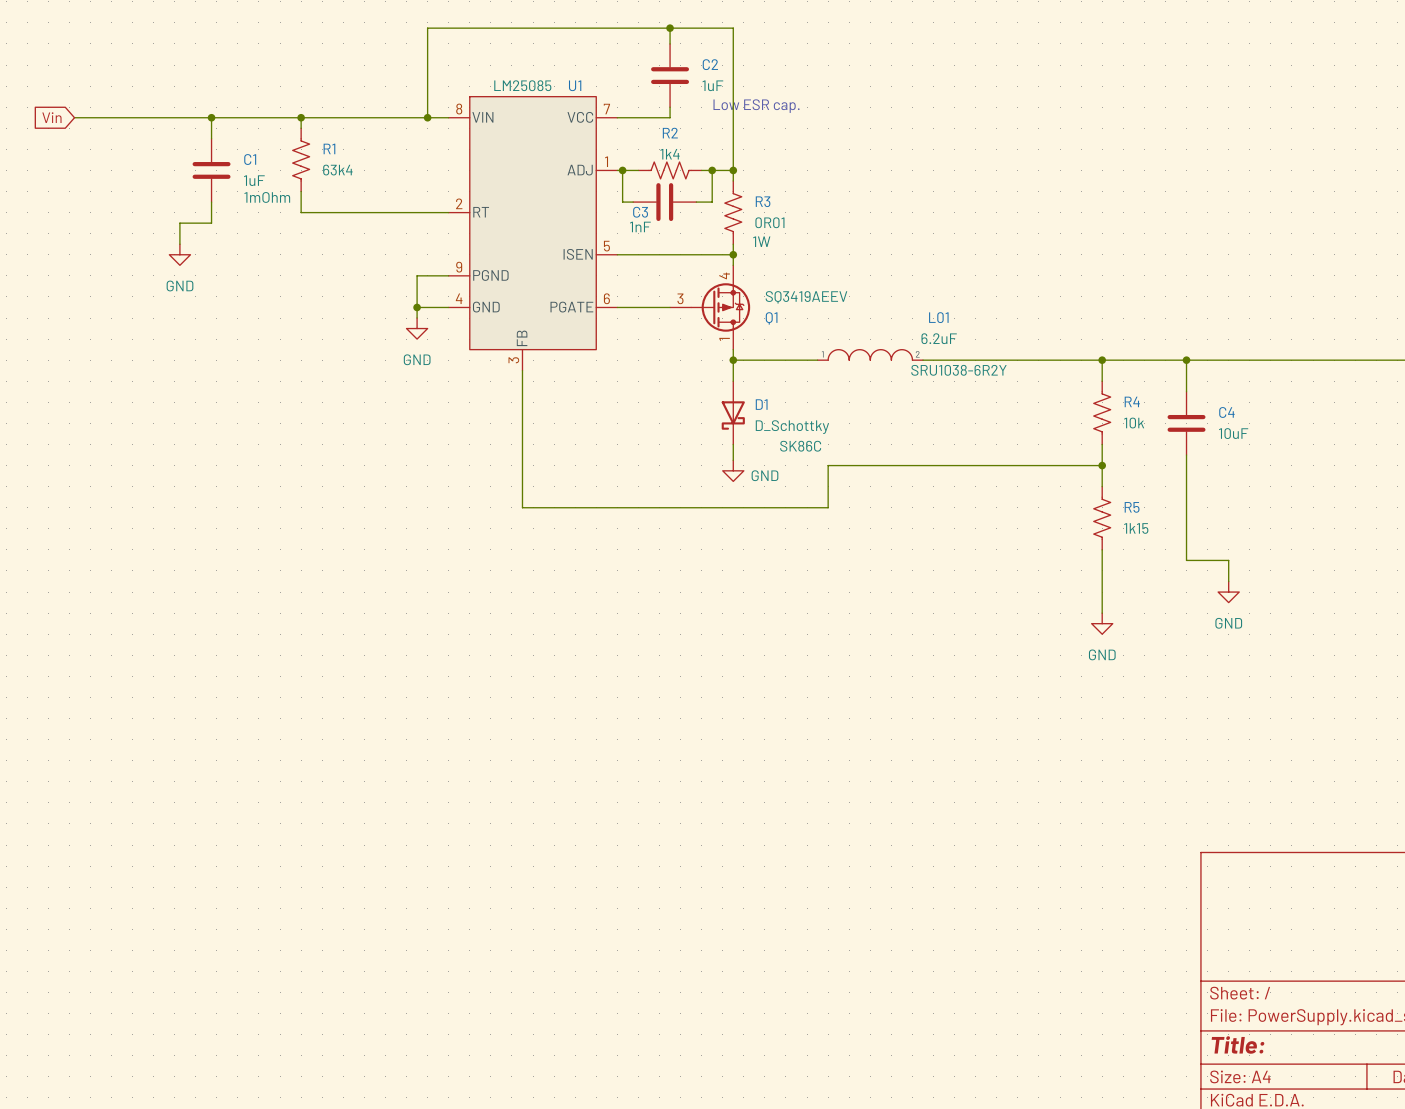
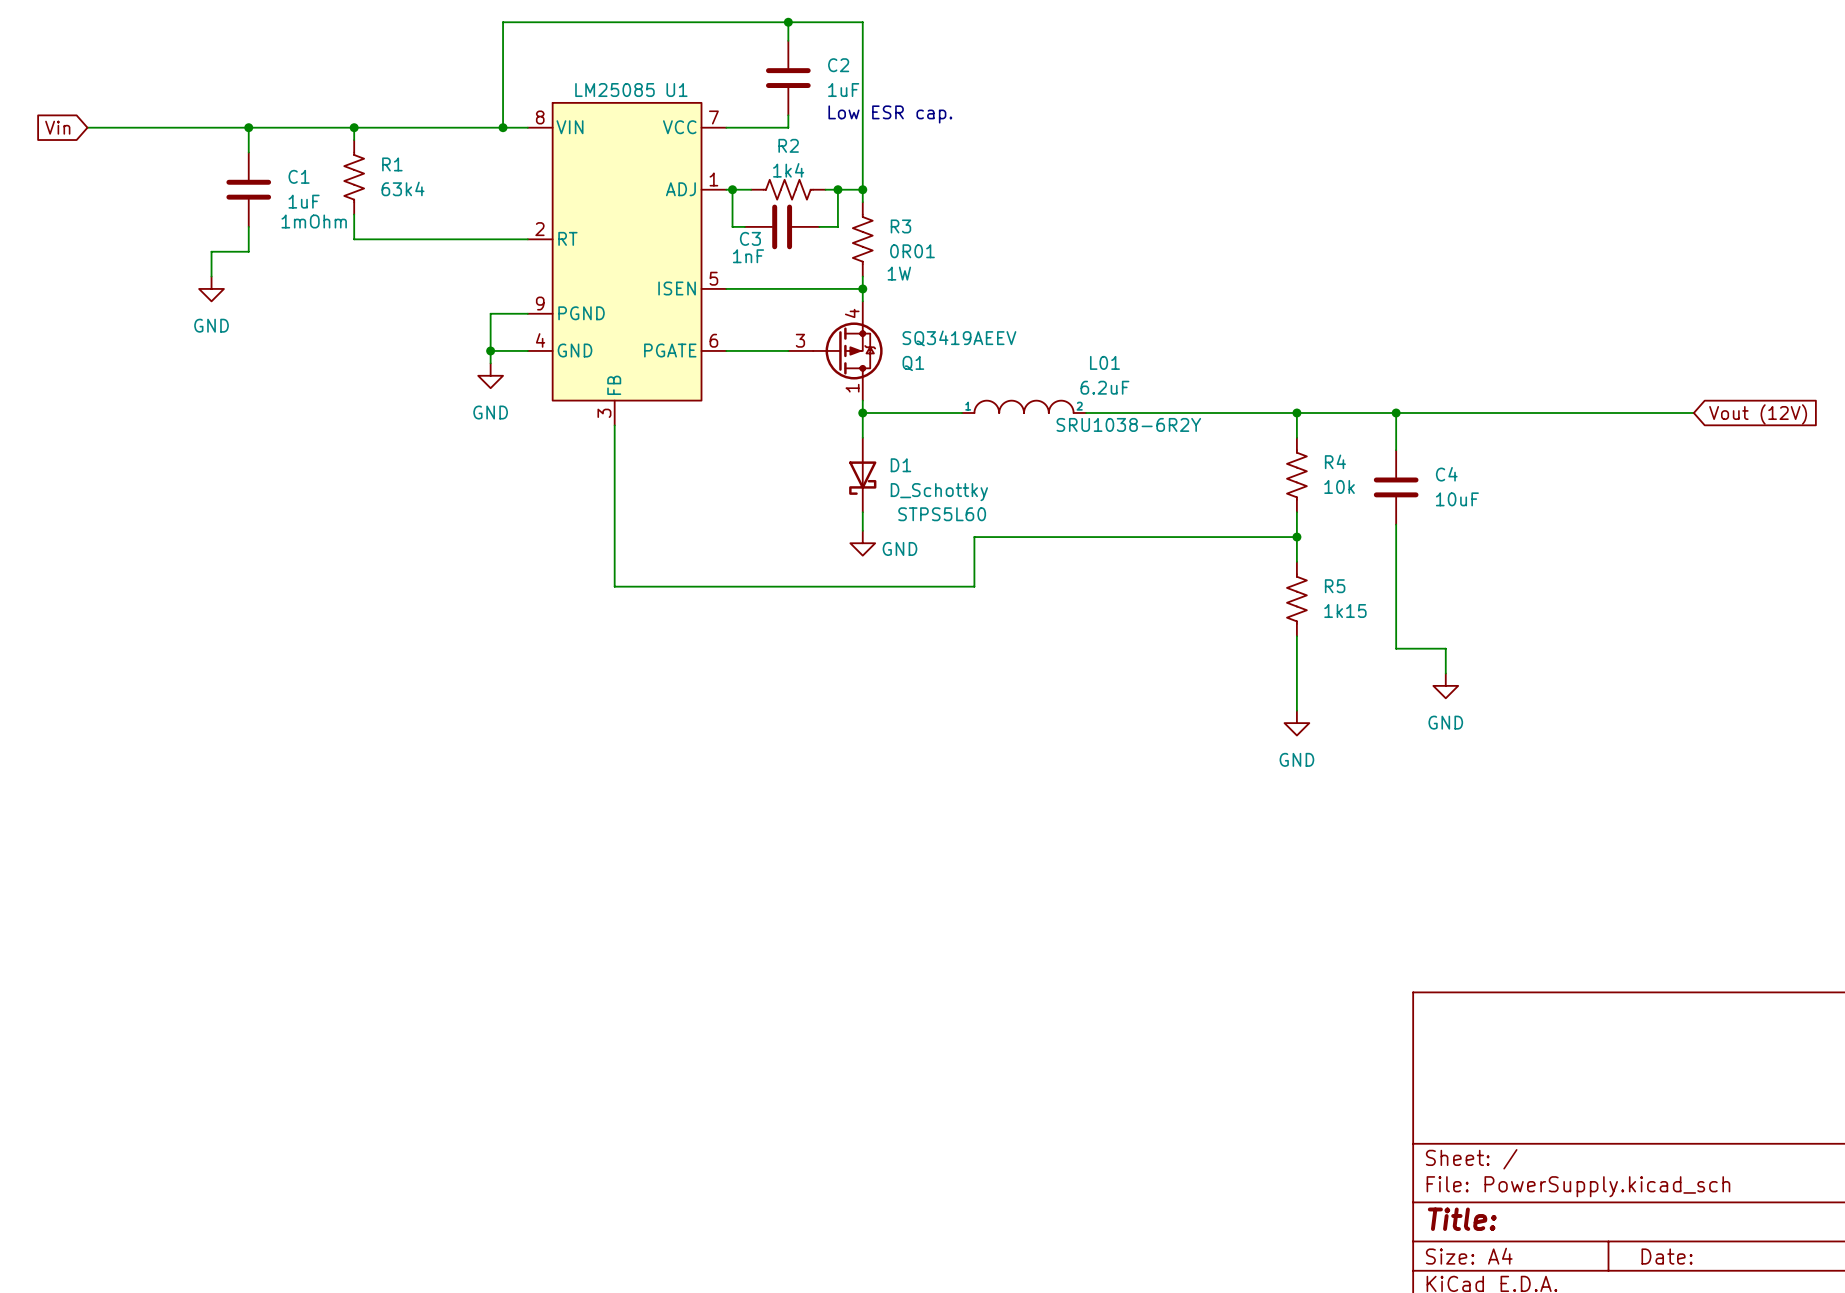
D1 text: SK86C (800, 446) -> STPS5L60 (942, 514)

